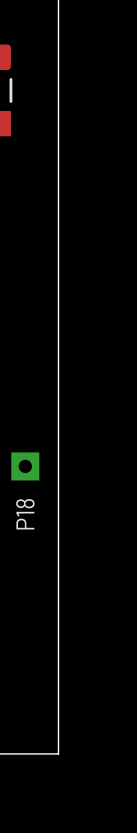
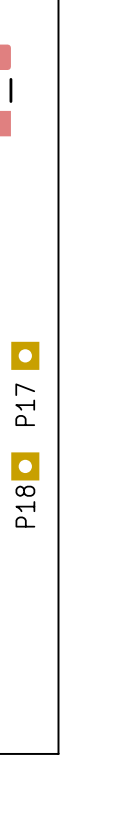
P17: none -> (25, 355)

